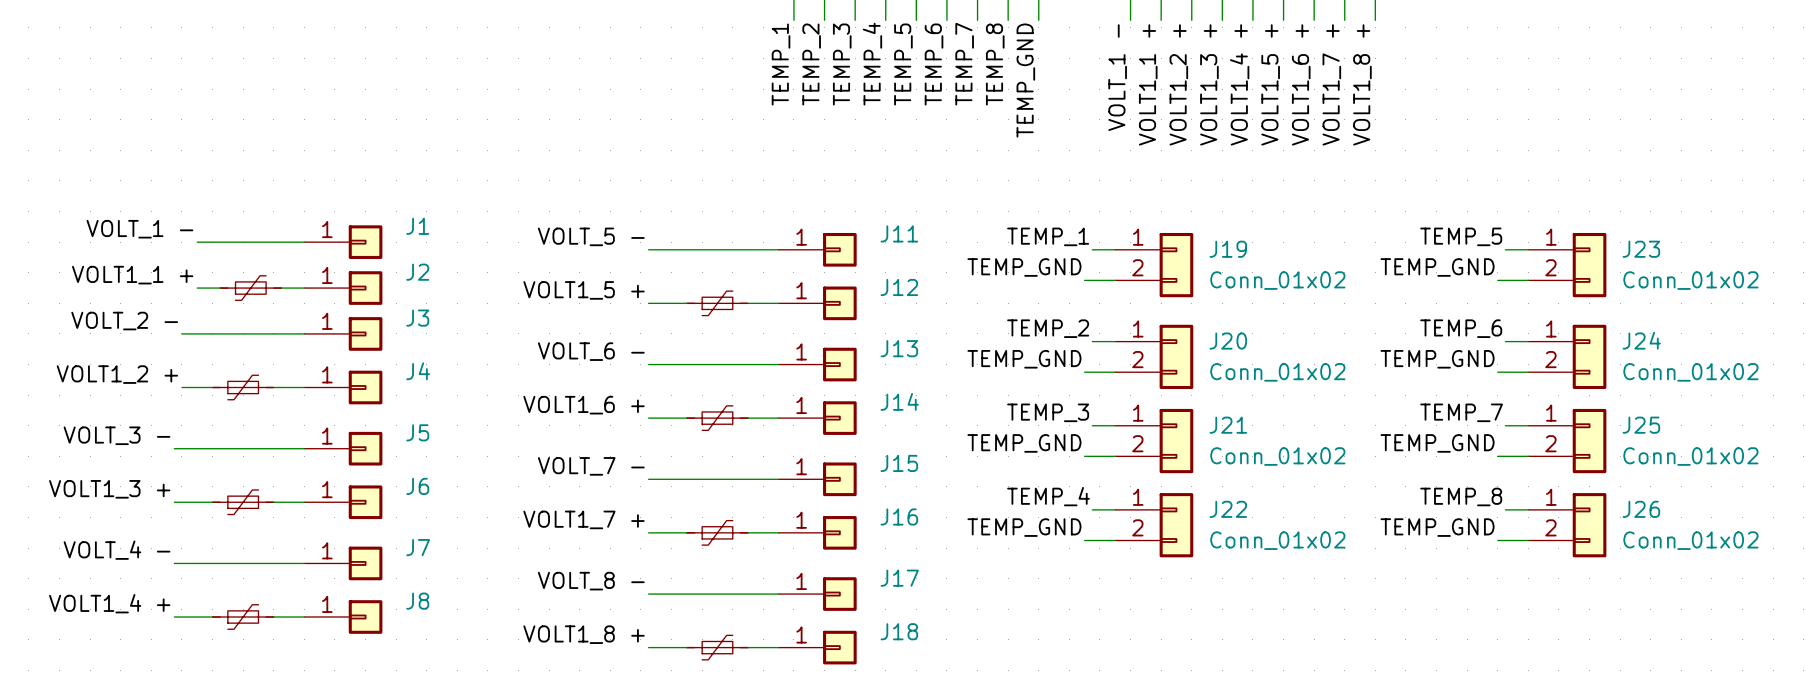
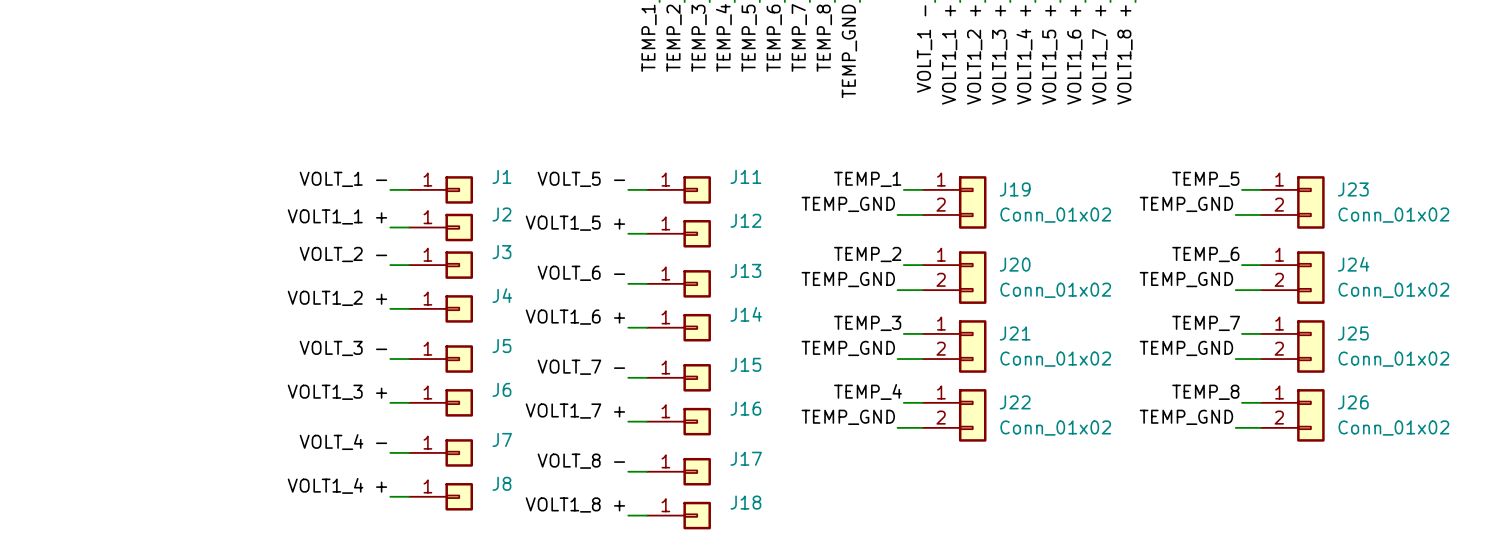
label position: VOLT_1 - (139, 229) -> VOLT_1 - (343, 179)
label position: VOLT_5 - (591, 236) -> VOLT_5 - (581, 179)
wire: (197, 242) (304, 242) -> none
J1 position: (343, 242) -> (441, 189)
wire: (648, 249) (755, 249) -> none
label position: VOLT1_1 + (132, 275) -> VOLT1_1 + (337, 216)
wire: (197, 288) (220, 288) -> (390, 189) (409, 189)
part: (250, 288) -> none
wire: (281, 288) (304, 288) -> (390, 227) (409, 227)
J2 position: (343, 288) -> (441, 227)
label position: VOLT1_5 + (584, 290) -> VOLT1_5 + (575, 223)
wire: (648, 303) (686, 303) -> none
part: (717, 303) -> none
wire: (748, 303) (755, 303) -> none
label position: VOLT_2 - (124, 321) -> VOLT_2 - (343, 254)
wire: (181, 333) (304, 333) -> none
J3 position: (343, 333) -> (441, 265)
wire: none -> (390, 265) (409, 265)
label position: VOLT_6 - (591, 351) -> VOLT_6 - (581, 273)
wire: (648, 364) (755, 364) -> none
label position: VOLT1_2 + (117, 374) -> VOLT1_2 + (337, 298)
wire: (181, 387) (212, 387) -> none
part: (243, 387) -> none
wire: (273, 387) (304, 387) -> none
J4 position: (343, 387) -> (441, 308)
wire: none -> (390, 308) (409, 308)
label position: VOLT1_6 + (584, 405) -> VOLT1_6 + (575, 317)
wire: (648, 418) (686, 418) -> none
part: (717, 418) -> none
wire: (748, 418) (755, 418) -> none
label position: VOLT_3 - (117, 435) -> VOLT_3 - (343, 348)
wire: (174, 448) (304, 448) -> none
J5 position: (343, 448) -> (441, 359)
wire: none -> (390, 359) (409, 359)
label position: VOLT_7 - (591, 466) -> VOLT_7 - (581, 367)
wire: (648, 479) (755, 479) -> none
label position: VOLT1_3 + (109, 489) -> VOLT1_3 + (337, 392)
wire: (174, 502) (212, 502) -> none
part: (243, 502) -> none
wire: (273, 502) (304, 502) -> none
J6 position: (343, 502) -> (441, 402)
wire: none -> (390, 402) (409, 402)
label position: VOLT1_7 + (584, 519) -> VOLT1_7 + (575, 411)
wire: (648, 532) (686, 532) -> none
part: (717, 532) -> none
wire: (748, 532) (755, 532) -> none
label position: VOLT_4 - (117, 550) -> VOLT_4 - (343, 442)
wire: (174, 563) (304, 563) -> none
J7 position: (343, 563) -> (441, 452)
wire: none -> (390, 452) (409, 452)
label position: VOLT_8 - (591, 581) -> VOLT_8 - (581, 461)
wire: (648, 594) (755, 594) -> none
label position: VOLT1_4 + (109, 603) -> VOLT1_4 + (337, 485)
wire: (174, 617) (212, 617) -> none
part: (243, 617) -> none
wire: (273, 617) (304, 617) -> none
J8 position: (343, 617) -> (441, 496)
wire: none -> (390, 496) (409, 496)
label position: VOLT1_8 + (584, 634) -> VOLT1_8 + (575, 504)
wire: (648, 647) (686, 647) -> none
part: (717, 647) -> none
wire: (748, 647) (755, 647) -> none

